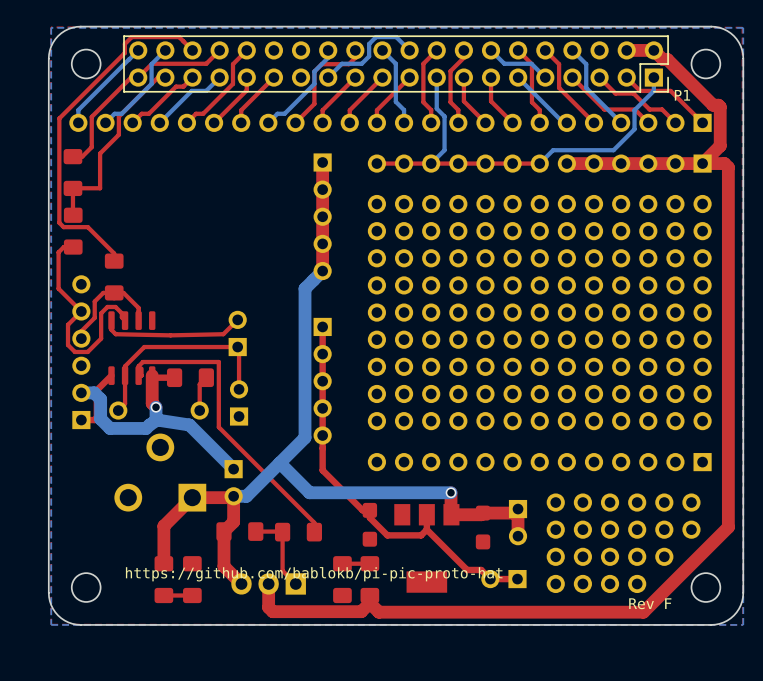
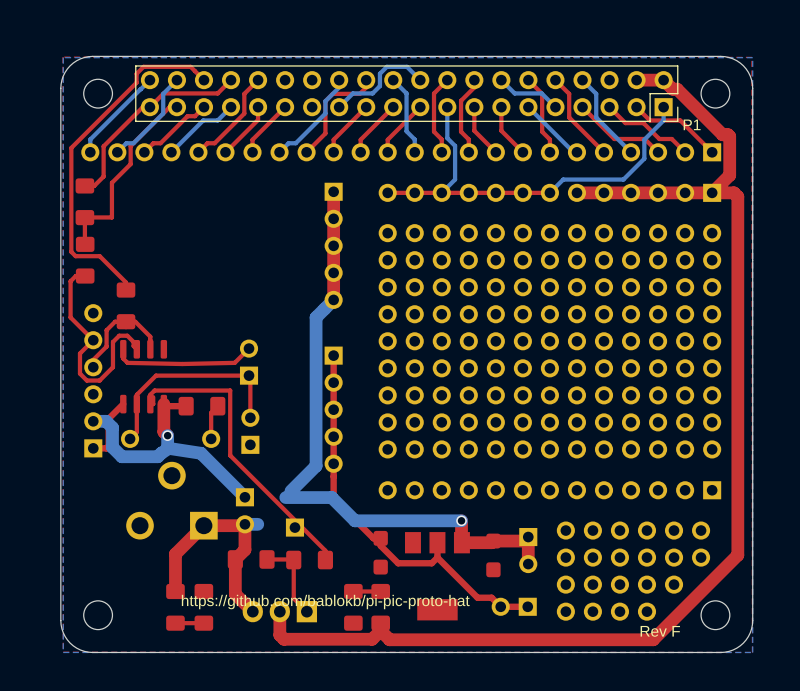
bottom track: (344, 492) (309, 492) (279, 462) (246, 496) -> (355, 520) (331, 497) (285, 497)
part: none -> (294, 527)

